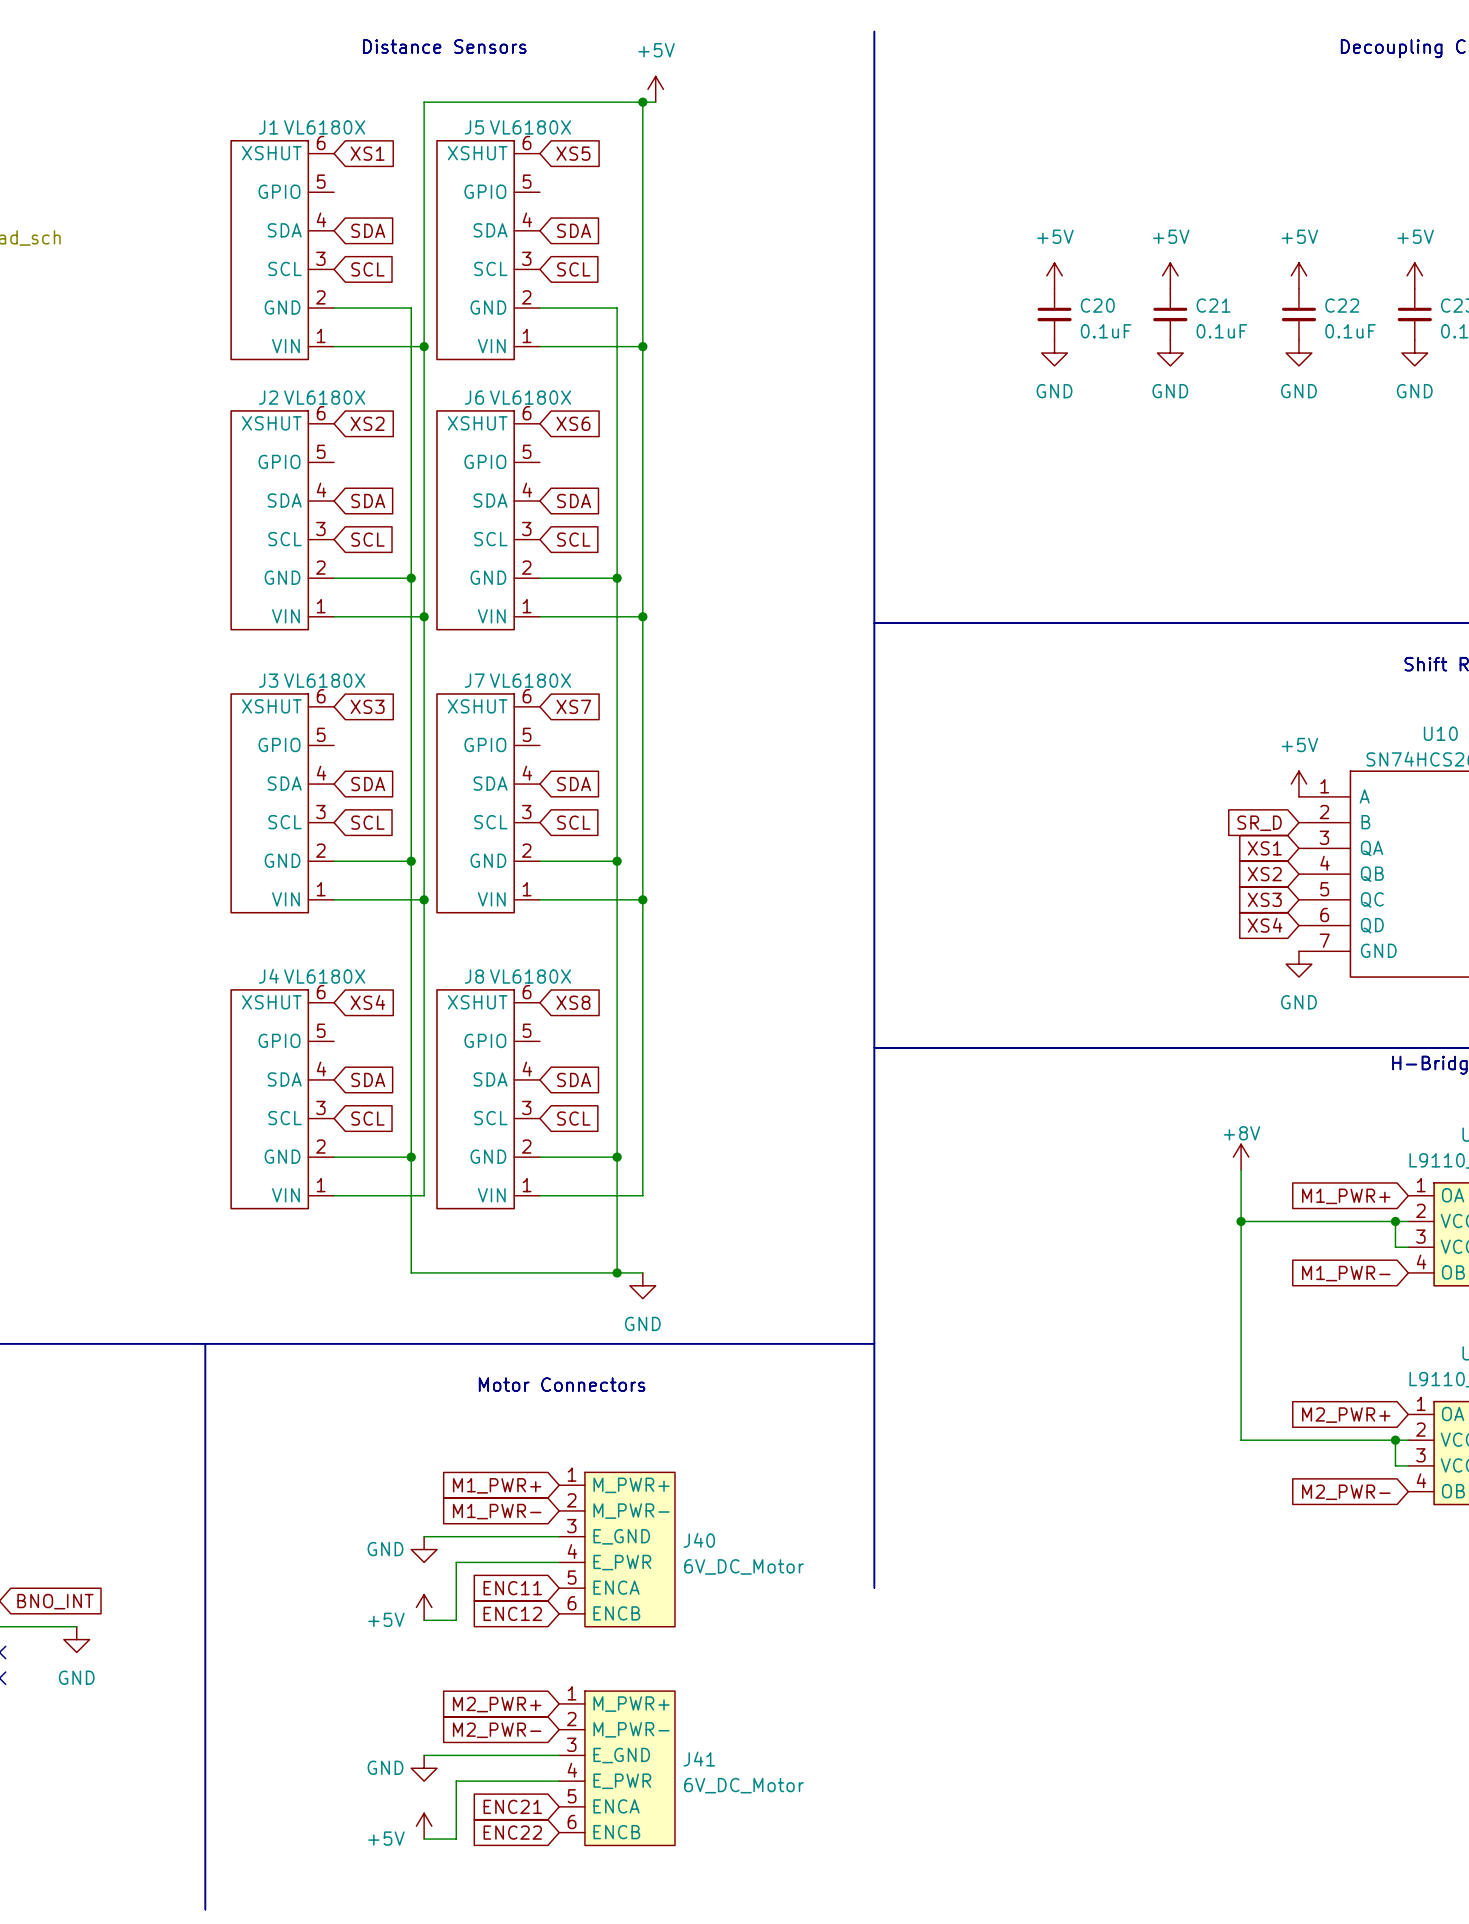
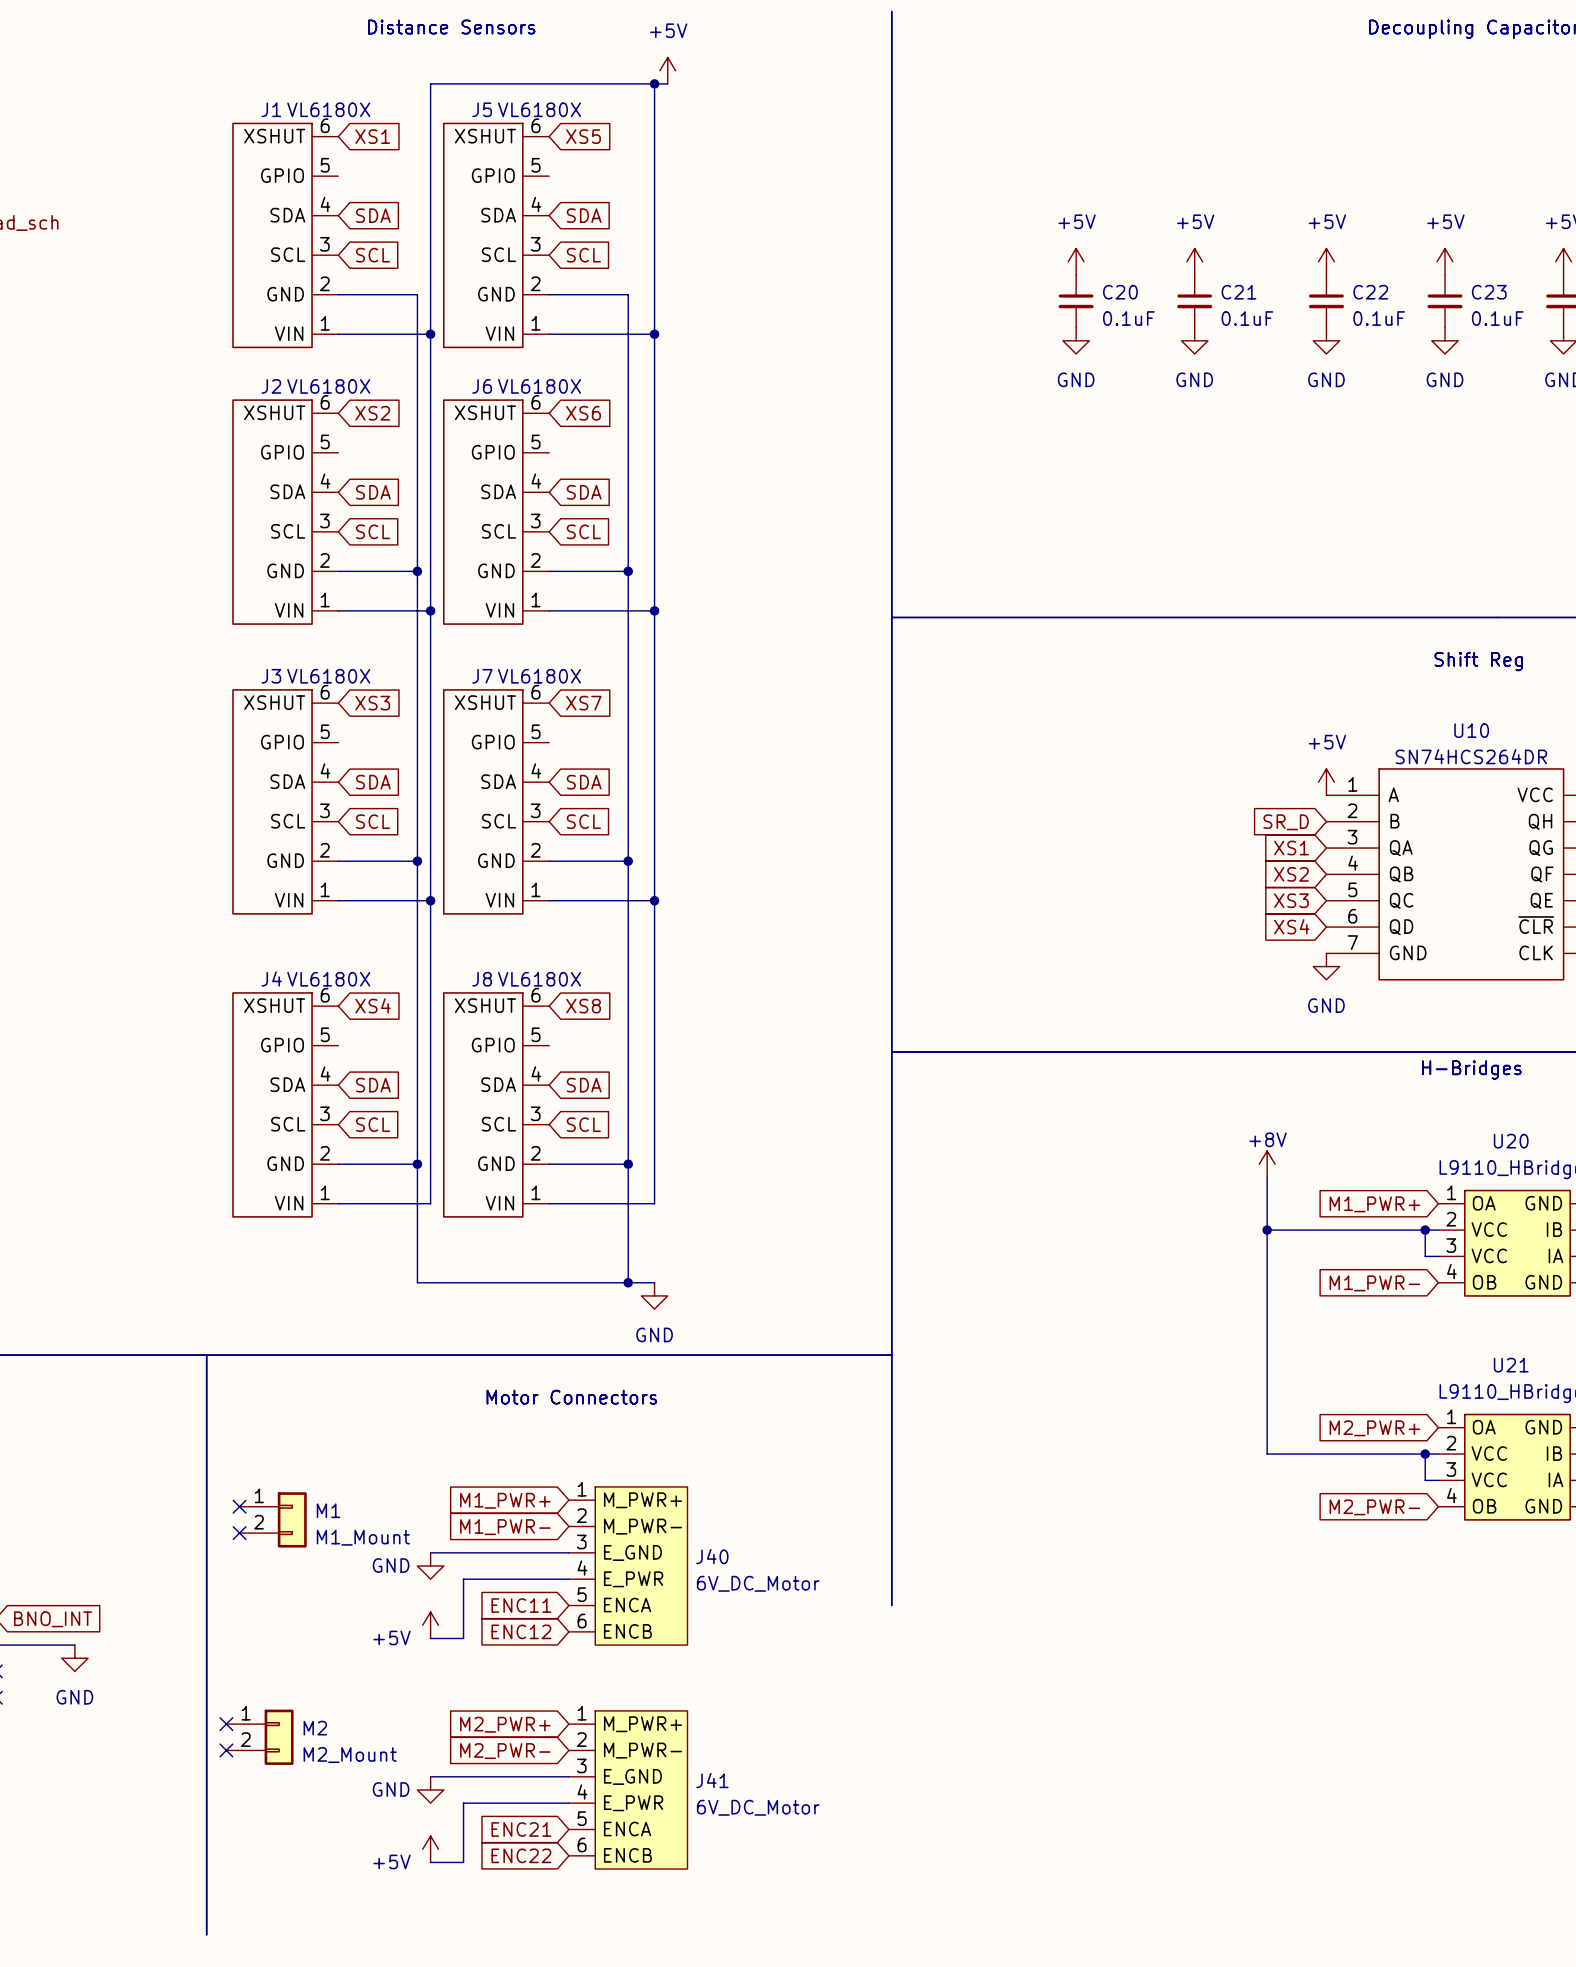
no-connect mark: none -> (239, 1506)
M1: none -> M1_Mount (273, 1519)
no-connect mark: none -> (239, 1533)
no-connect mark: none -> (226, 1724)
M2: none -> M2_Mount (259, 1737)
no-connect mark: none -> (226, 1750)

